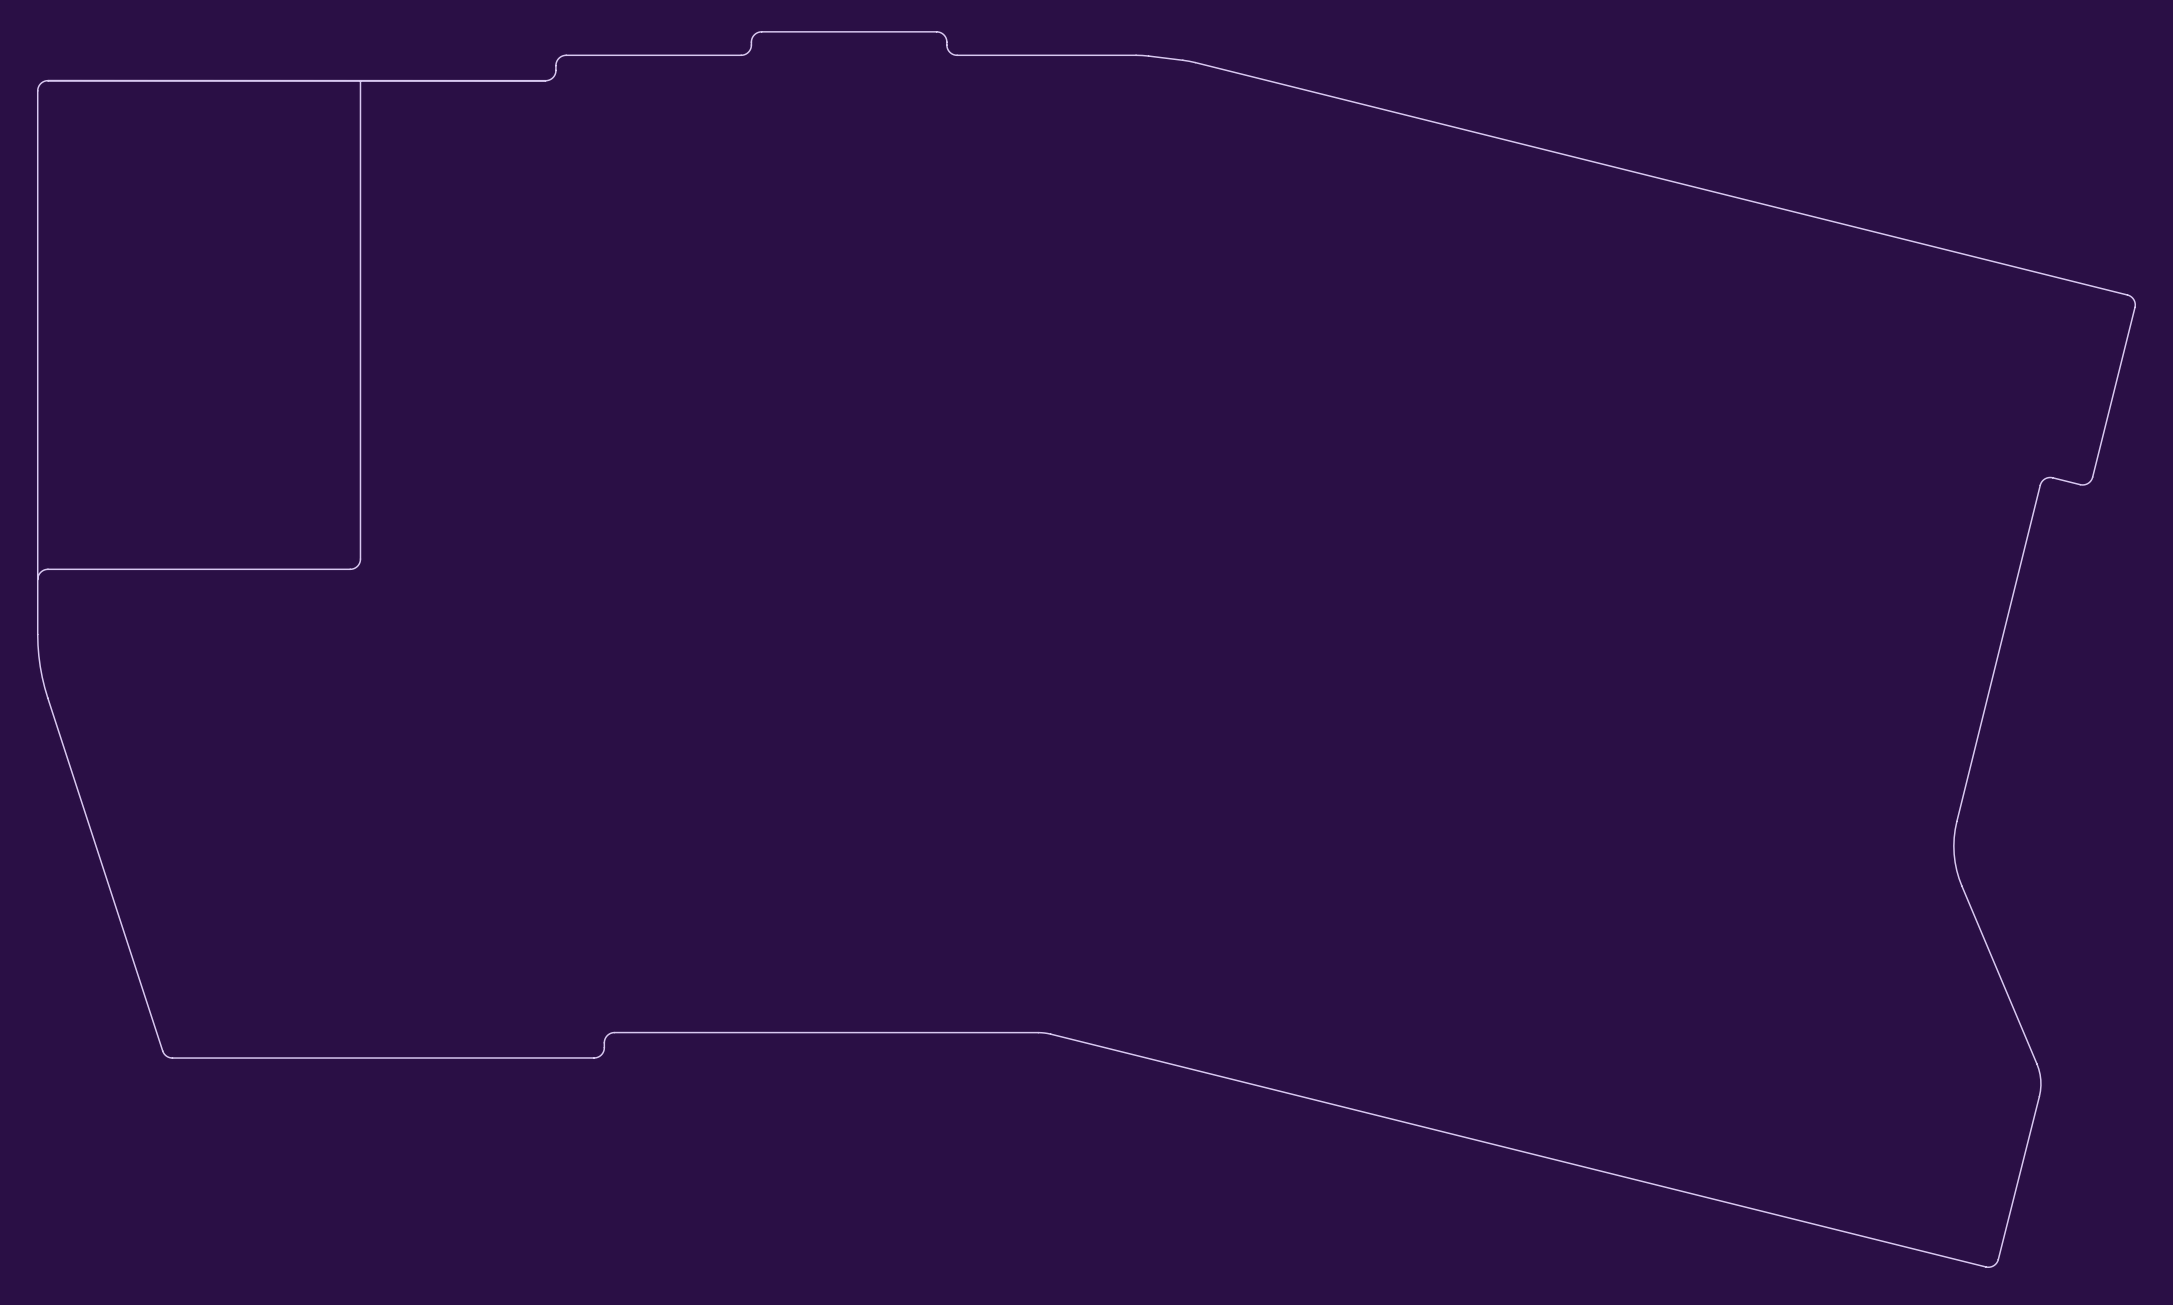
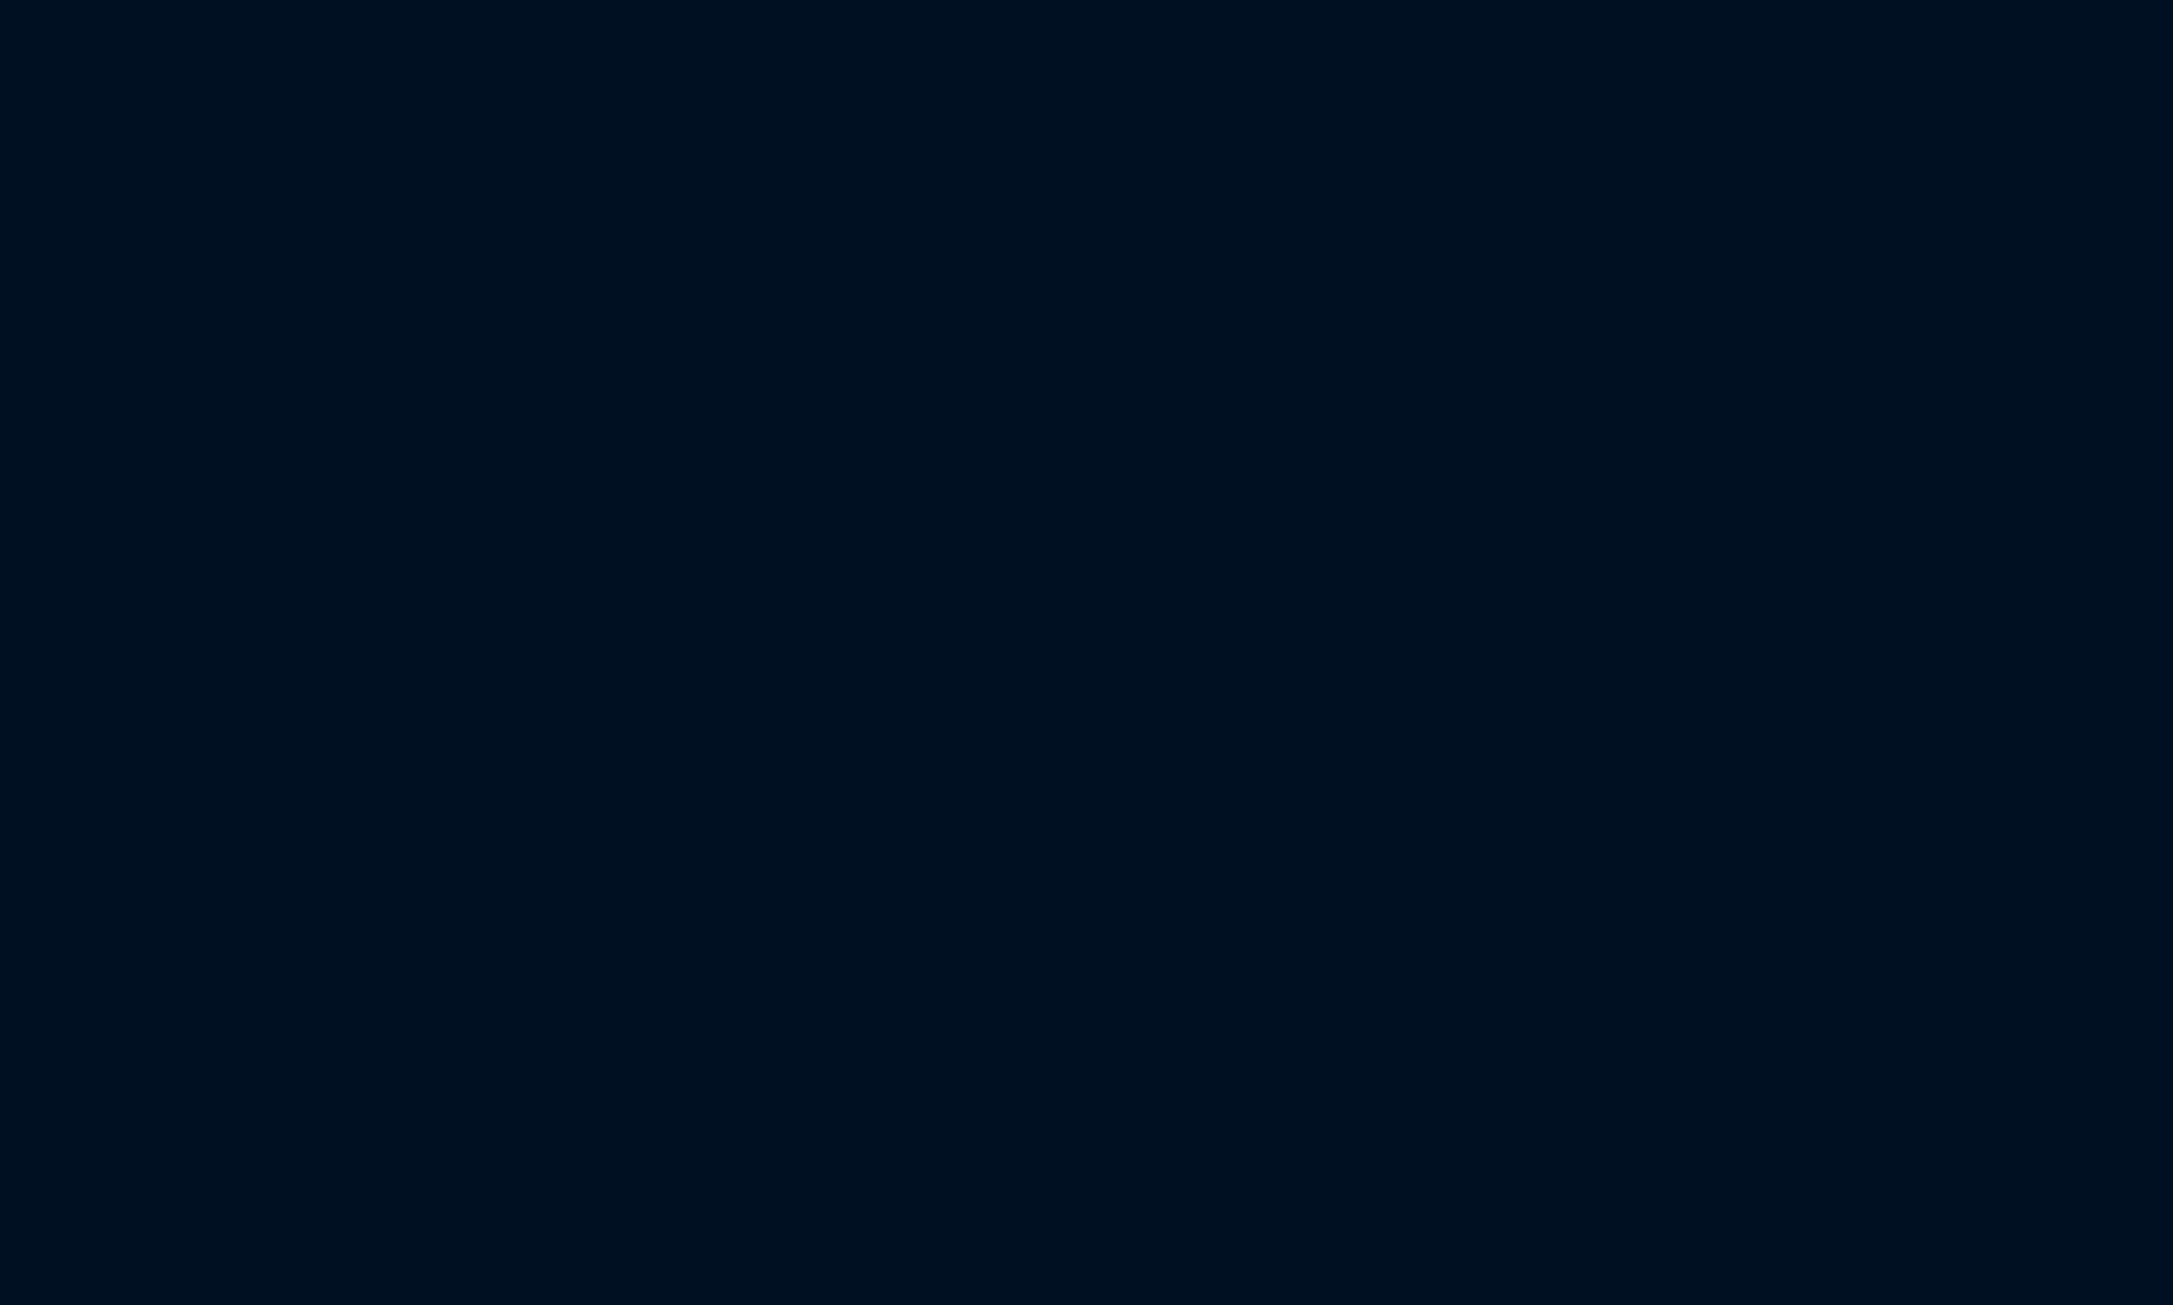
board edge: (761, 31) (937, 31) (945, 36) (949, 51) (955, 55) (1136, 55) (1189, 61) (2132, 297) (2134, 307) (2091, 479) (2086, 484) (2081, 484) (2048, 477) (2040, 484) (1955, 829) (1954, 854) (1959, 878) (2036, 1063) (2040, 1079) (2039, 1096) (1995, 1264) (1985, 1266) (1044, 1033) (614, 1032) (606, 1036) (602, 1052) (594, 1057) (172, 1058) (165, 1055) (47, 698) (38, 655) (37, 90) (39, 85) (47, 80) (547, 80) (553, 76) (556, 61) (563, 55) (742, 55) (750, 50) (753, 35) (761, 31) -> none
board edge: (360, 80) (359, 564) (350, 569) (47, 569) (40, 572) (37, 579) -> none

